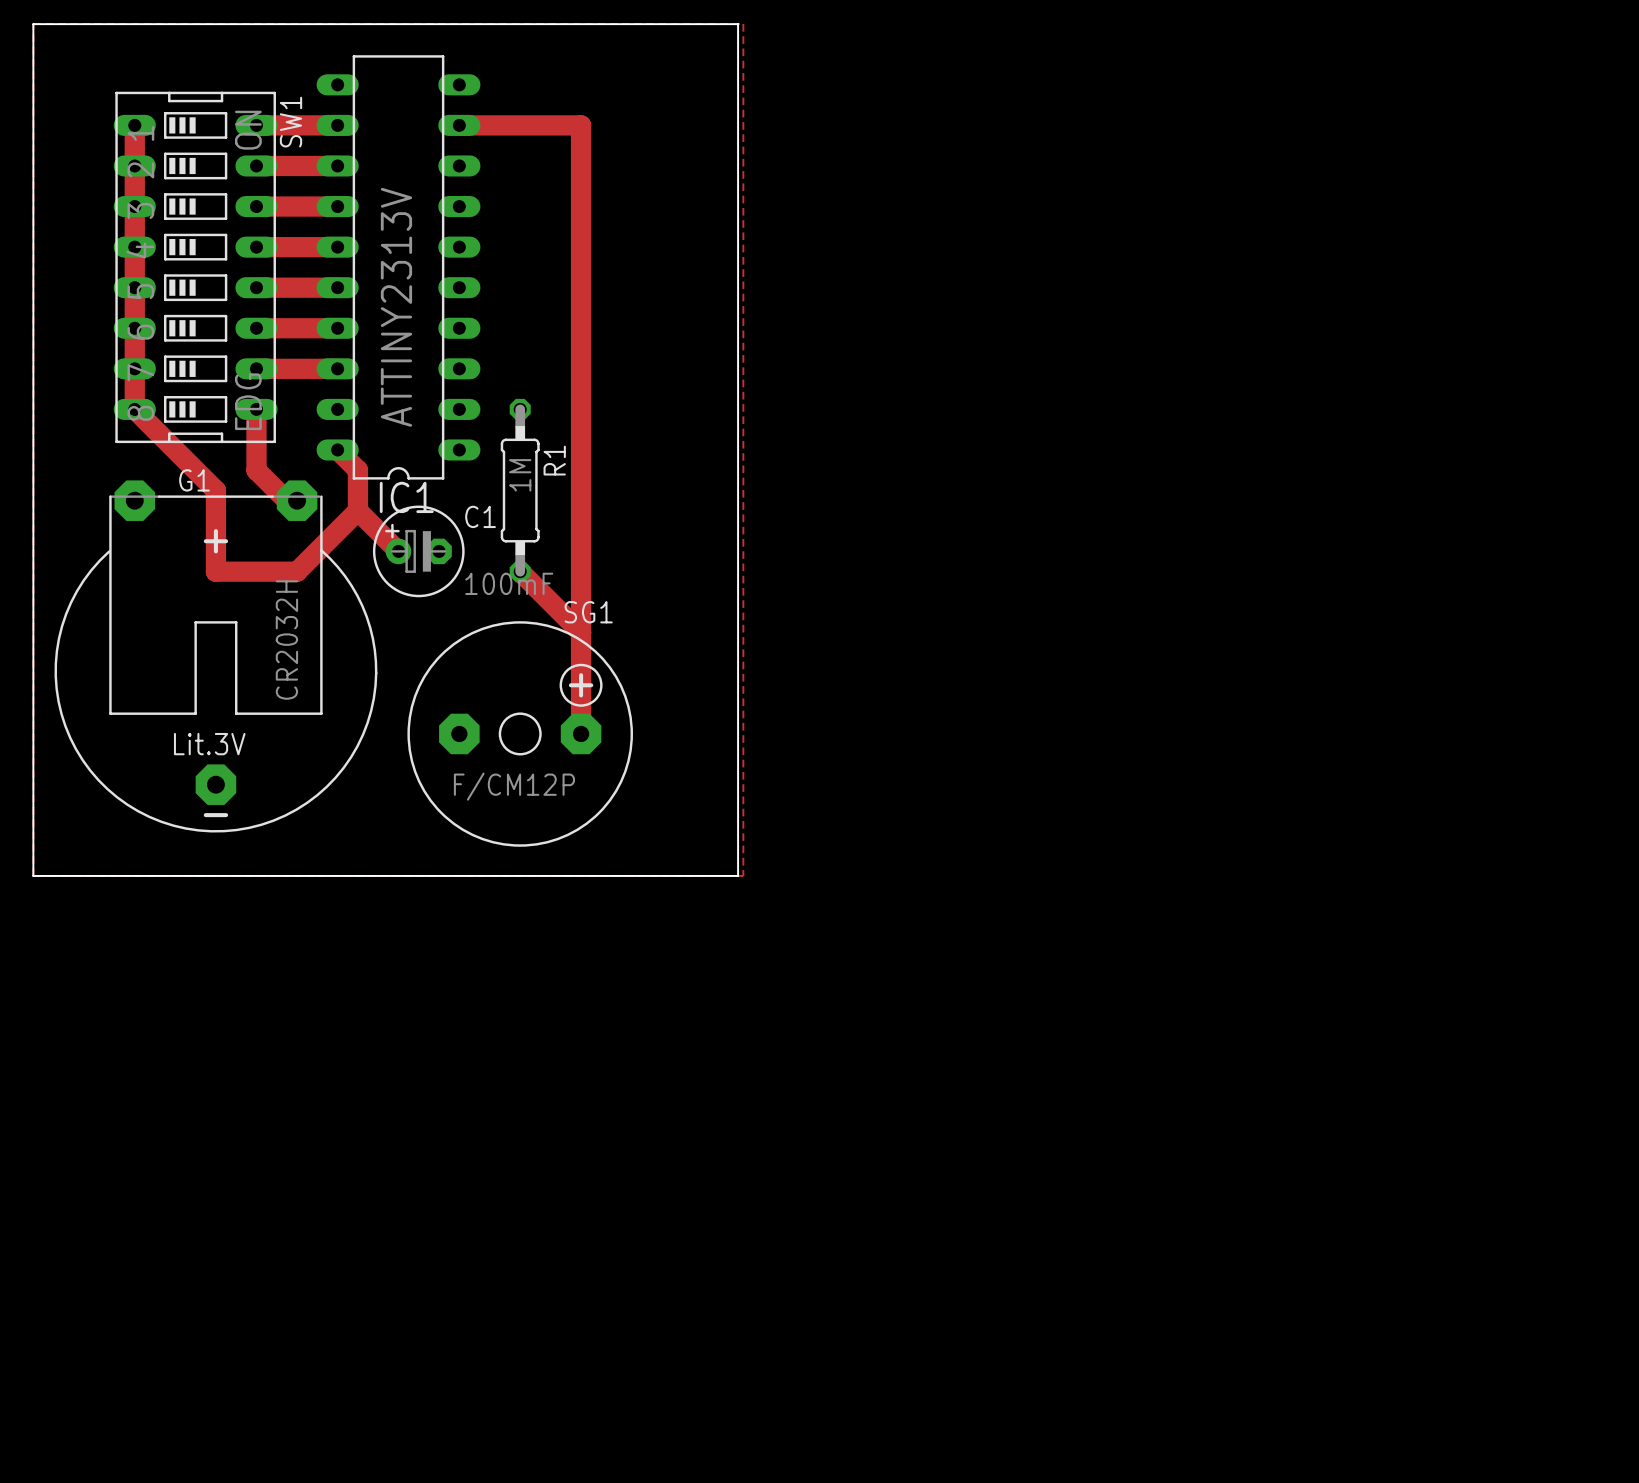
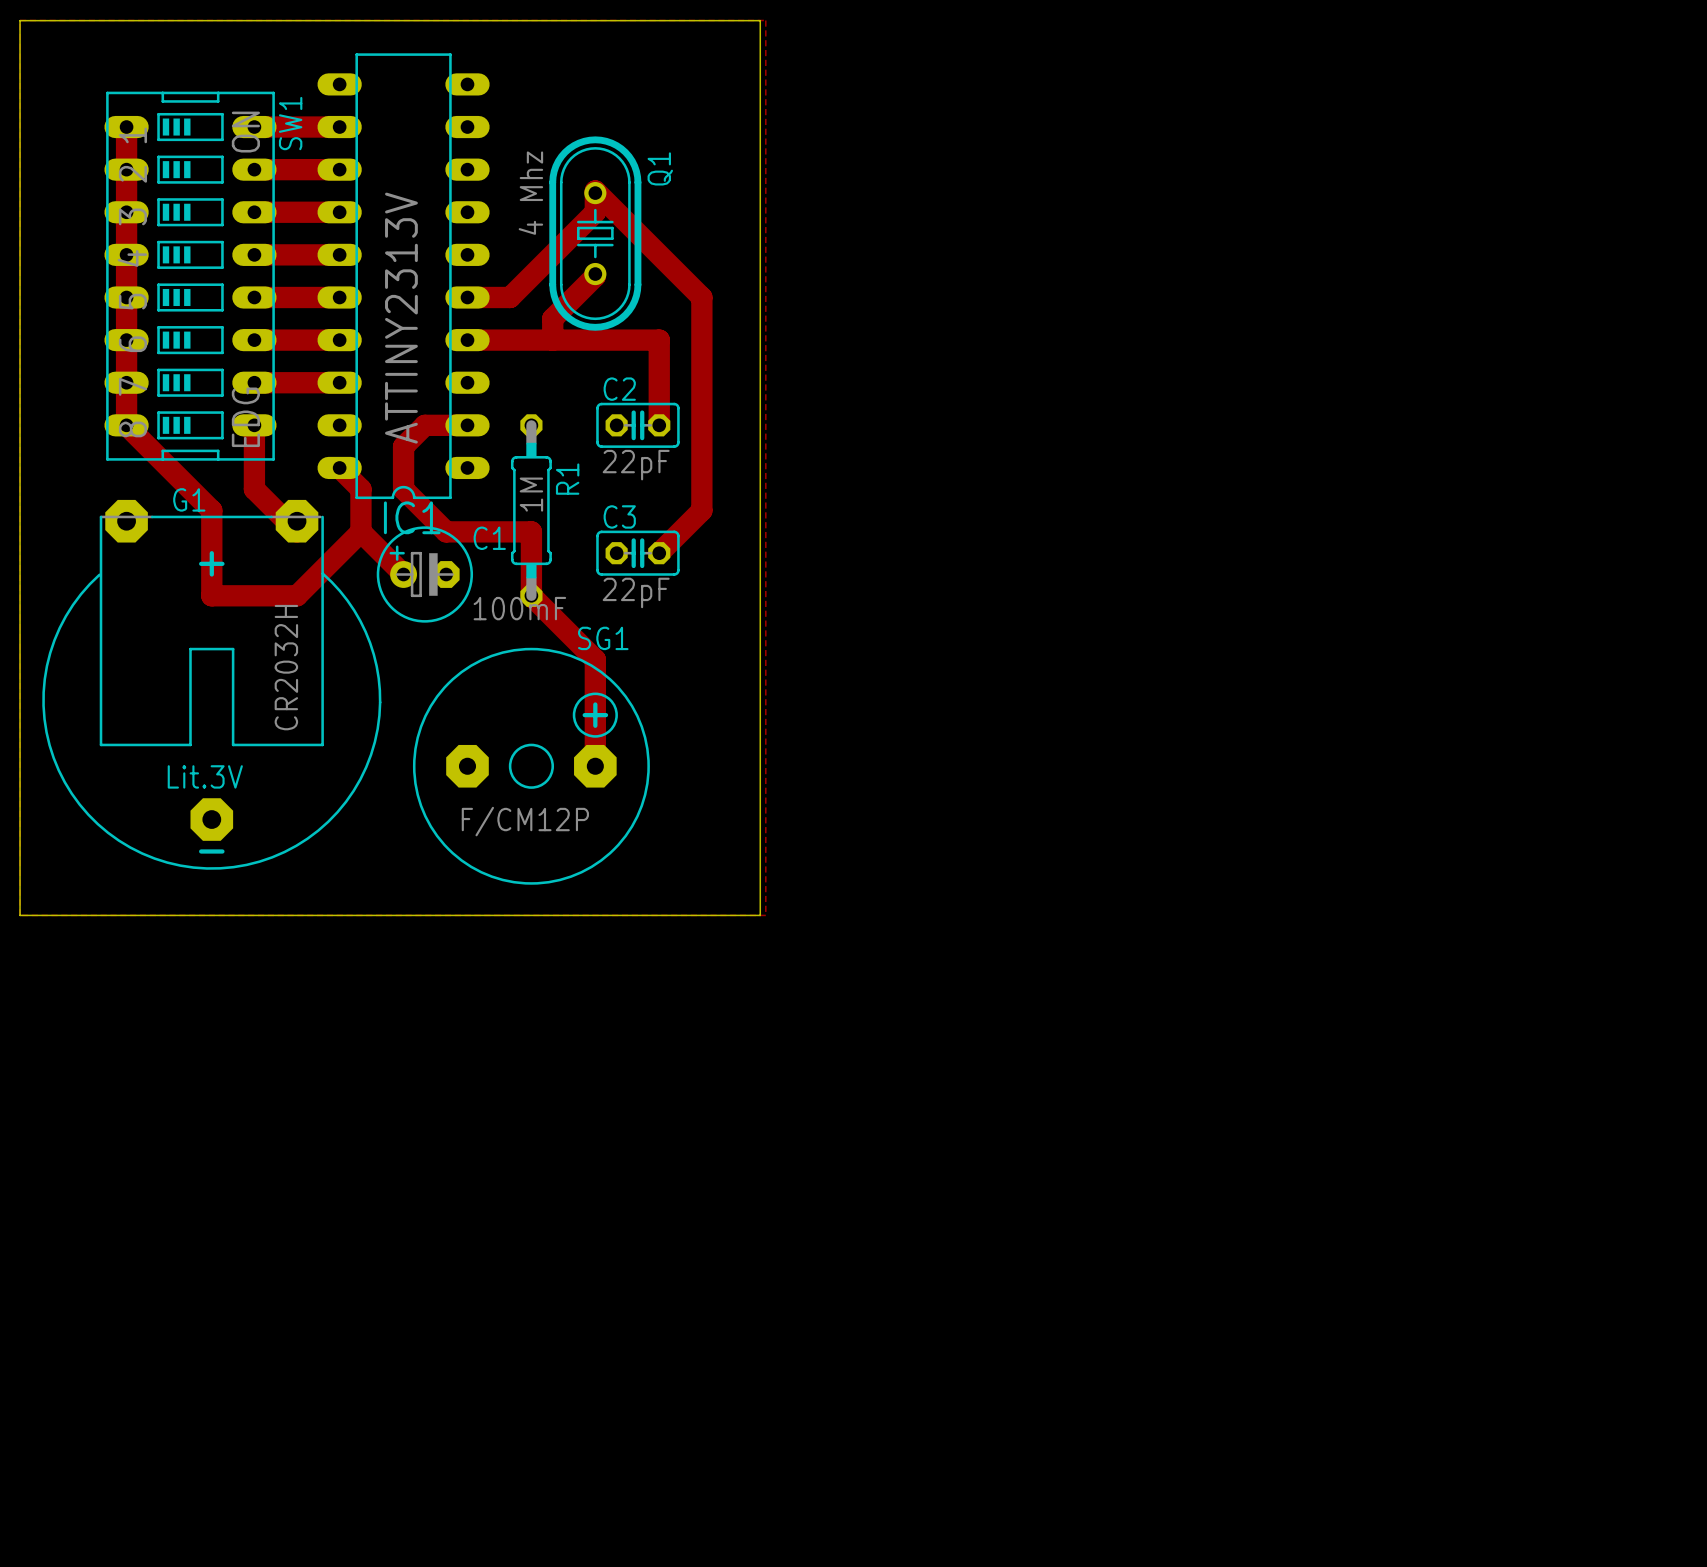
top track: (459, 125) (581, 125) (581, 186) -> (659, 553) (701, 510) (701, 297) (595, 190)
top track: (581, 206) (581, 265) -> (595, 212) (510, 297) (467, 297)
Q1: none -> 4 Mhz (595, 233)
top track: (581, 267) (581, 632) -> (595, 276) (552, 318) (552, 340)
top track: none -> (467, 340) (659, 340) (659, 425)
top track: none -> (467, 425) (424, 425) (403, 446) (403, 489) (446, 531) (531, 531) (531, 595)
C2: none -> 22pF (637, 425)
C3: none -> 22pF (637, 553)

